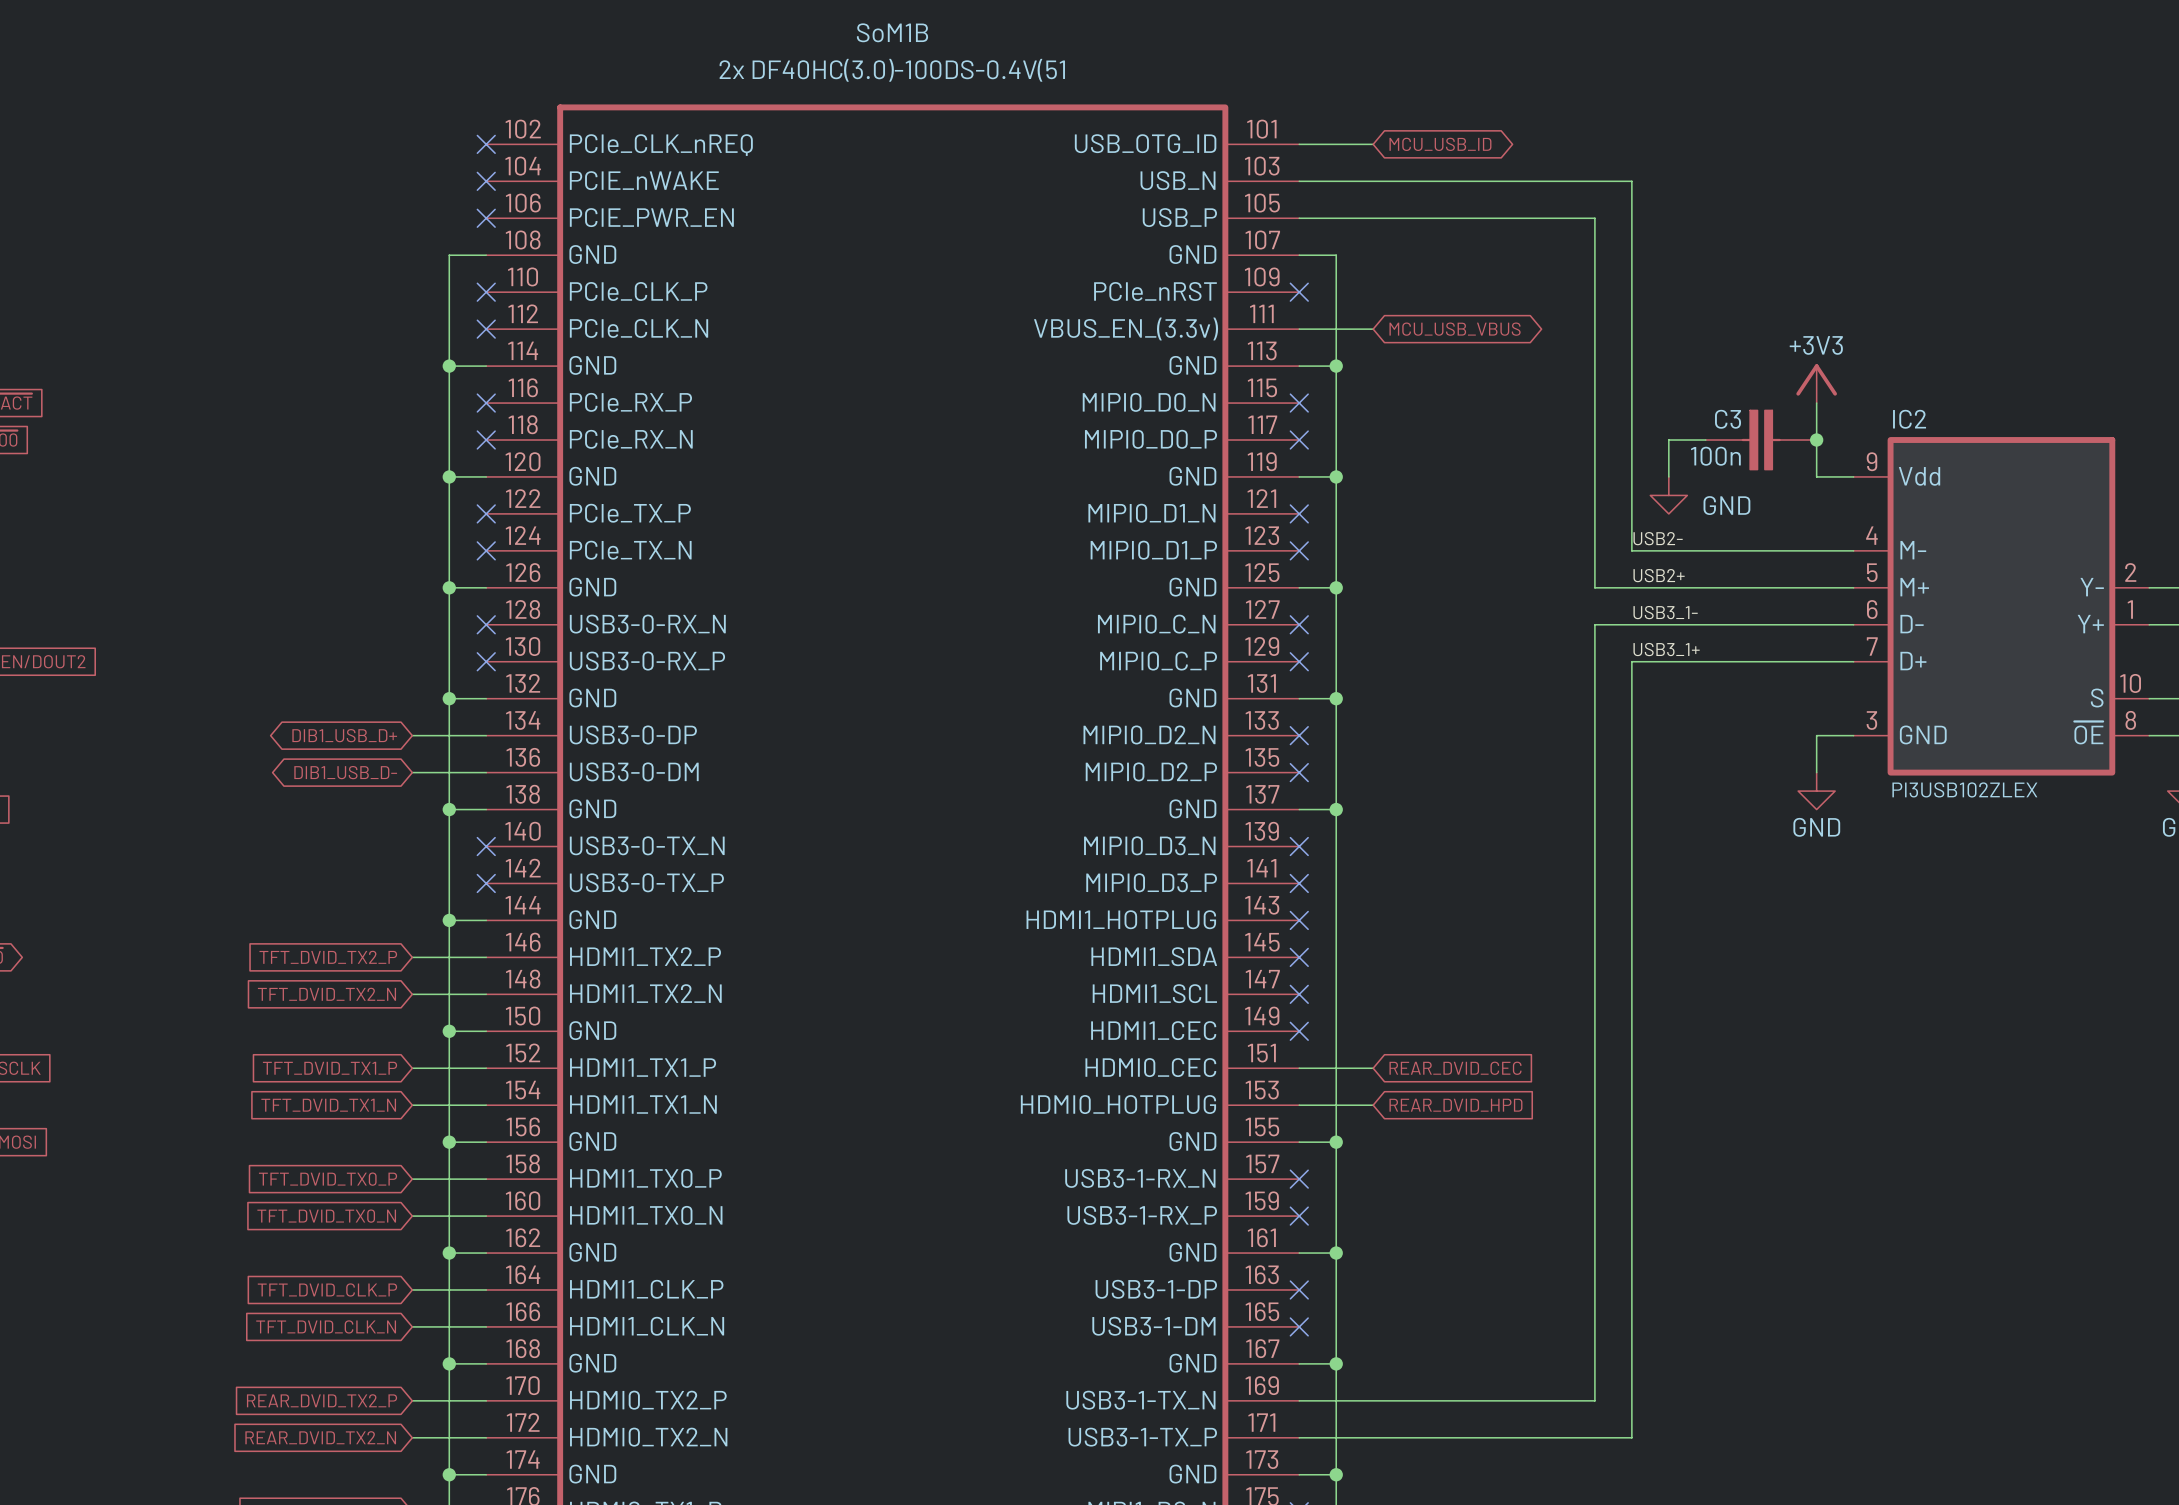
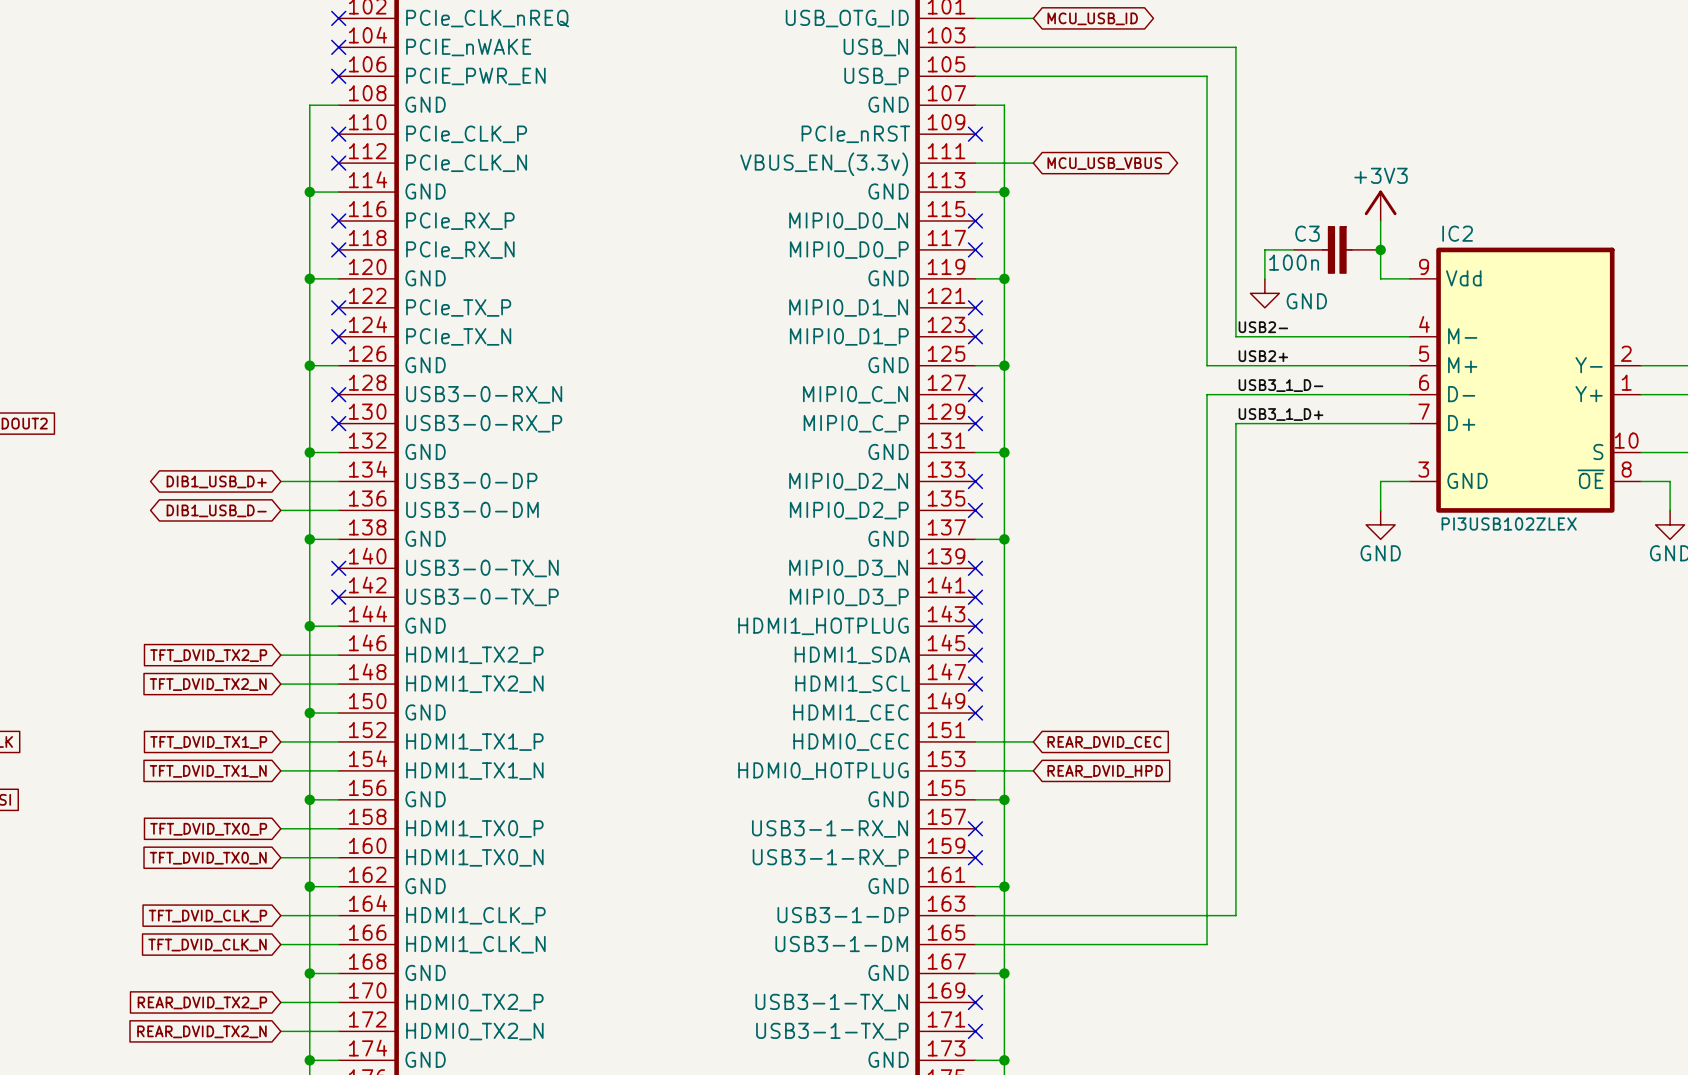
label: USB3_1- (1665, 612) -> USB3_1_D- (1280, 385)
label: USB3_1+ (1666, 649) -> USB3_1_D+ (1280, 414)
no-connect mark: (1299, 1289) -> none
wire: (1631, 1289) (1631, 1437) (1299, 1437) -> (1235, 915) (975, 915)
no-connect mark: (1299, 1326) -> none
wire: (1594, 1326) (1594, 1400) (1299, 1400) -> (1207, 944) (975, 944)
no-connect mark: none -> (975, 1002)
no-connect mark: none -> (975, 1031)

